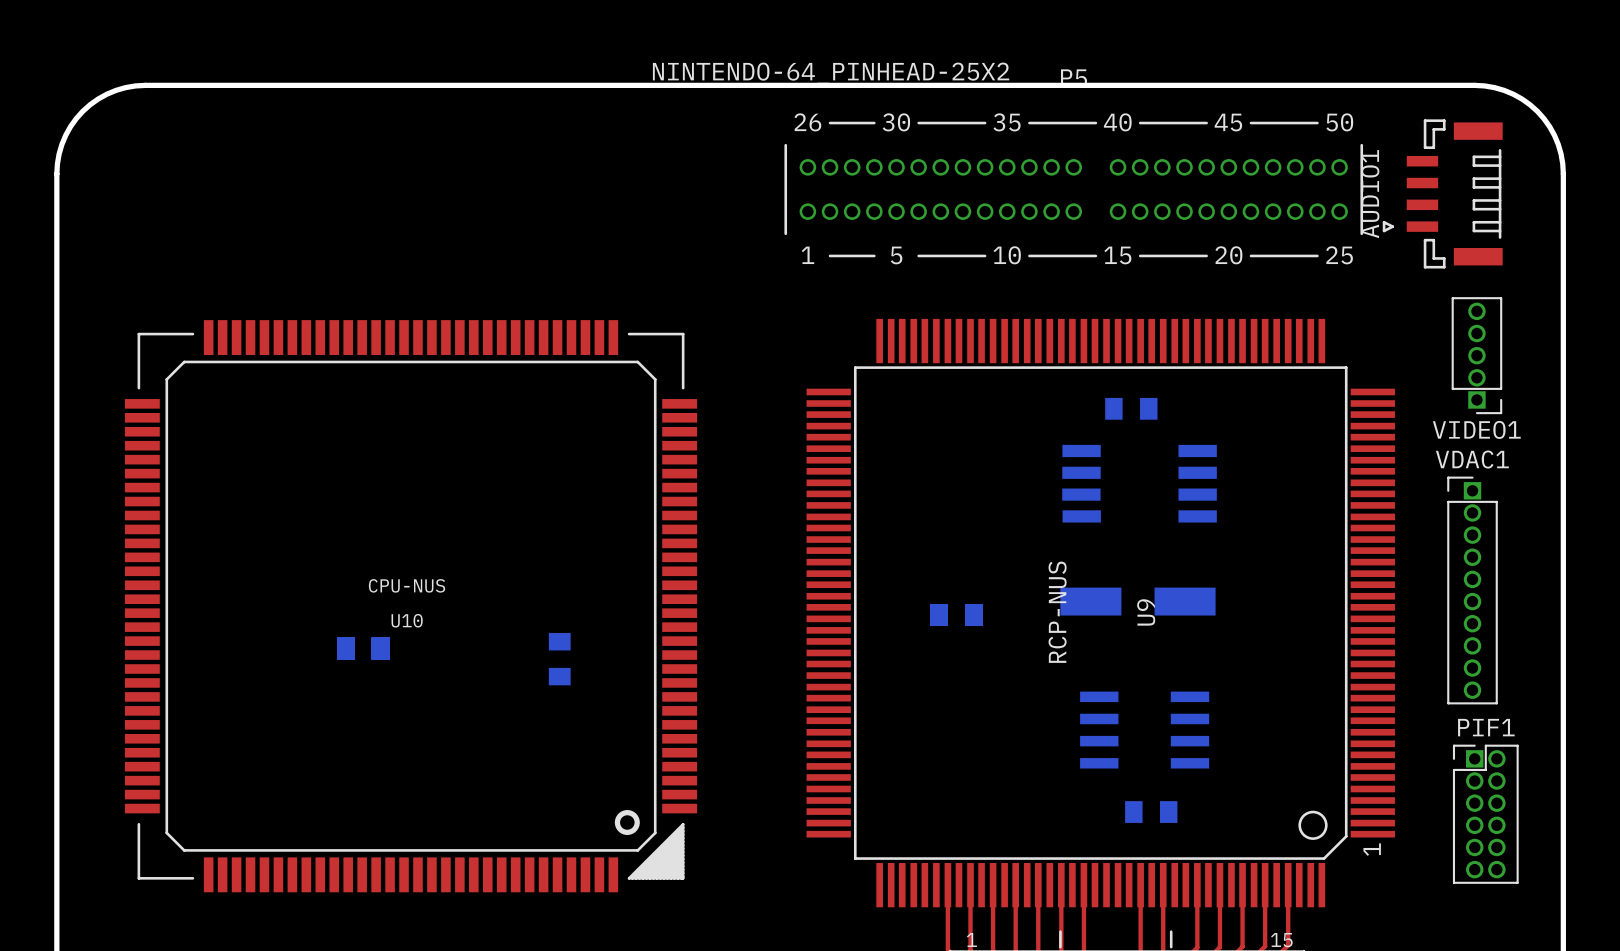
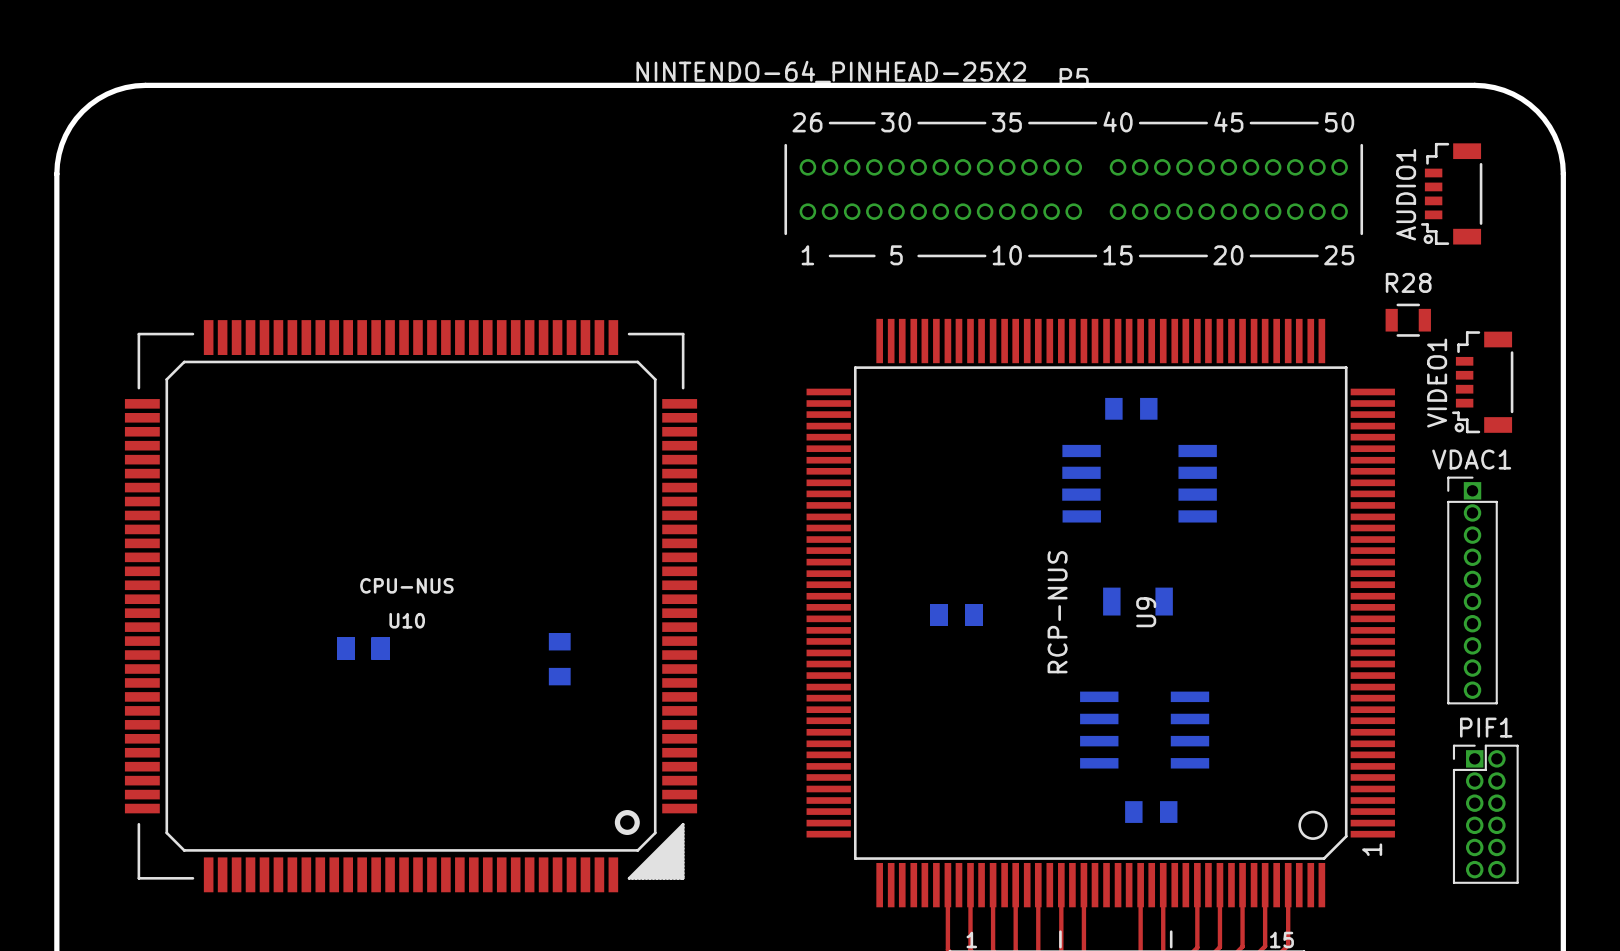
AUDIO1 footprint: [1382, 119, 1503, 269] -> [1420, 142, 1483, 245]
VIDEO1 footprint: [1451, 297, 1503, 415] -> [1451, 331, 1514, 434]
R28: none -> (1408, 320)
VIDEO1 name position: VIDEO1 (1476, 429) -> VIDEO1 (1437, 383)
part footprint: [1060, 587, 1216, 616] -> [1103, 587, 1173, 616]

